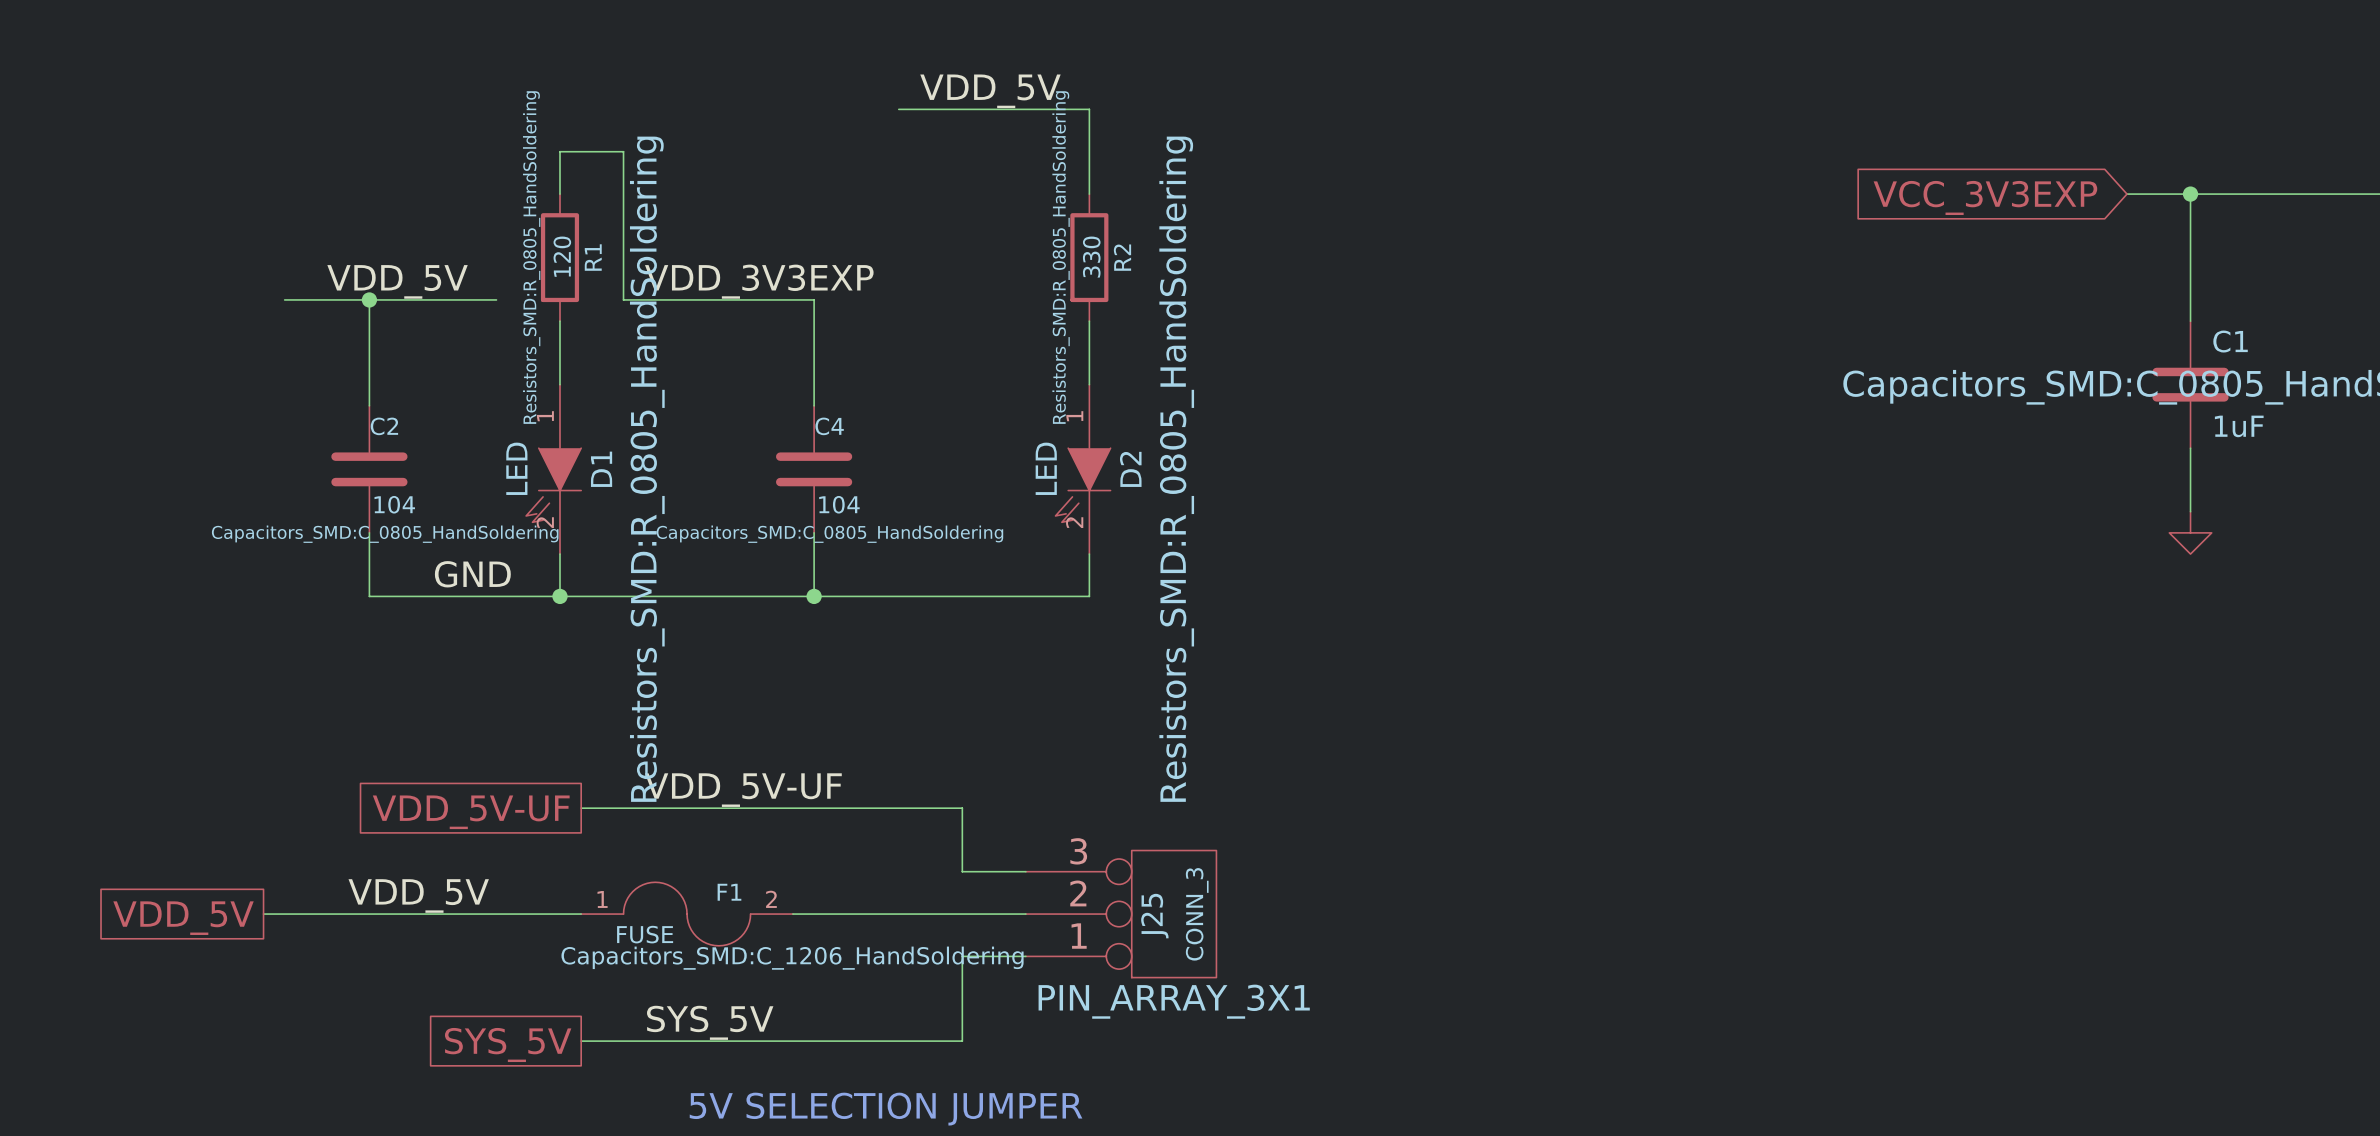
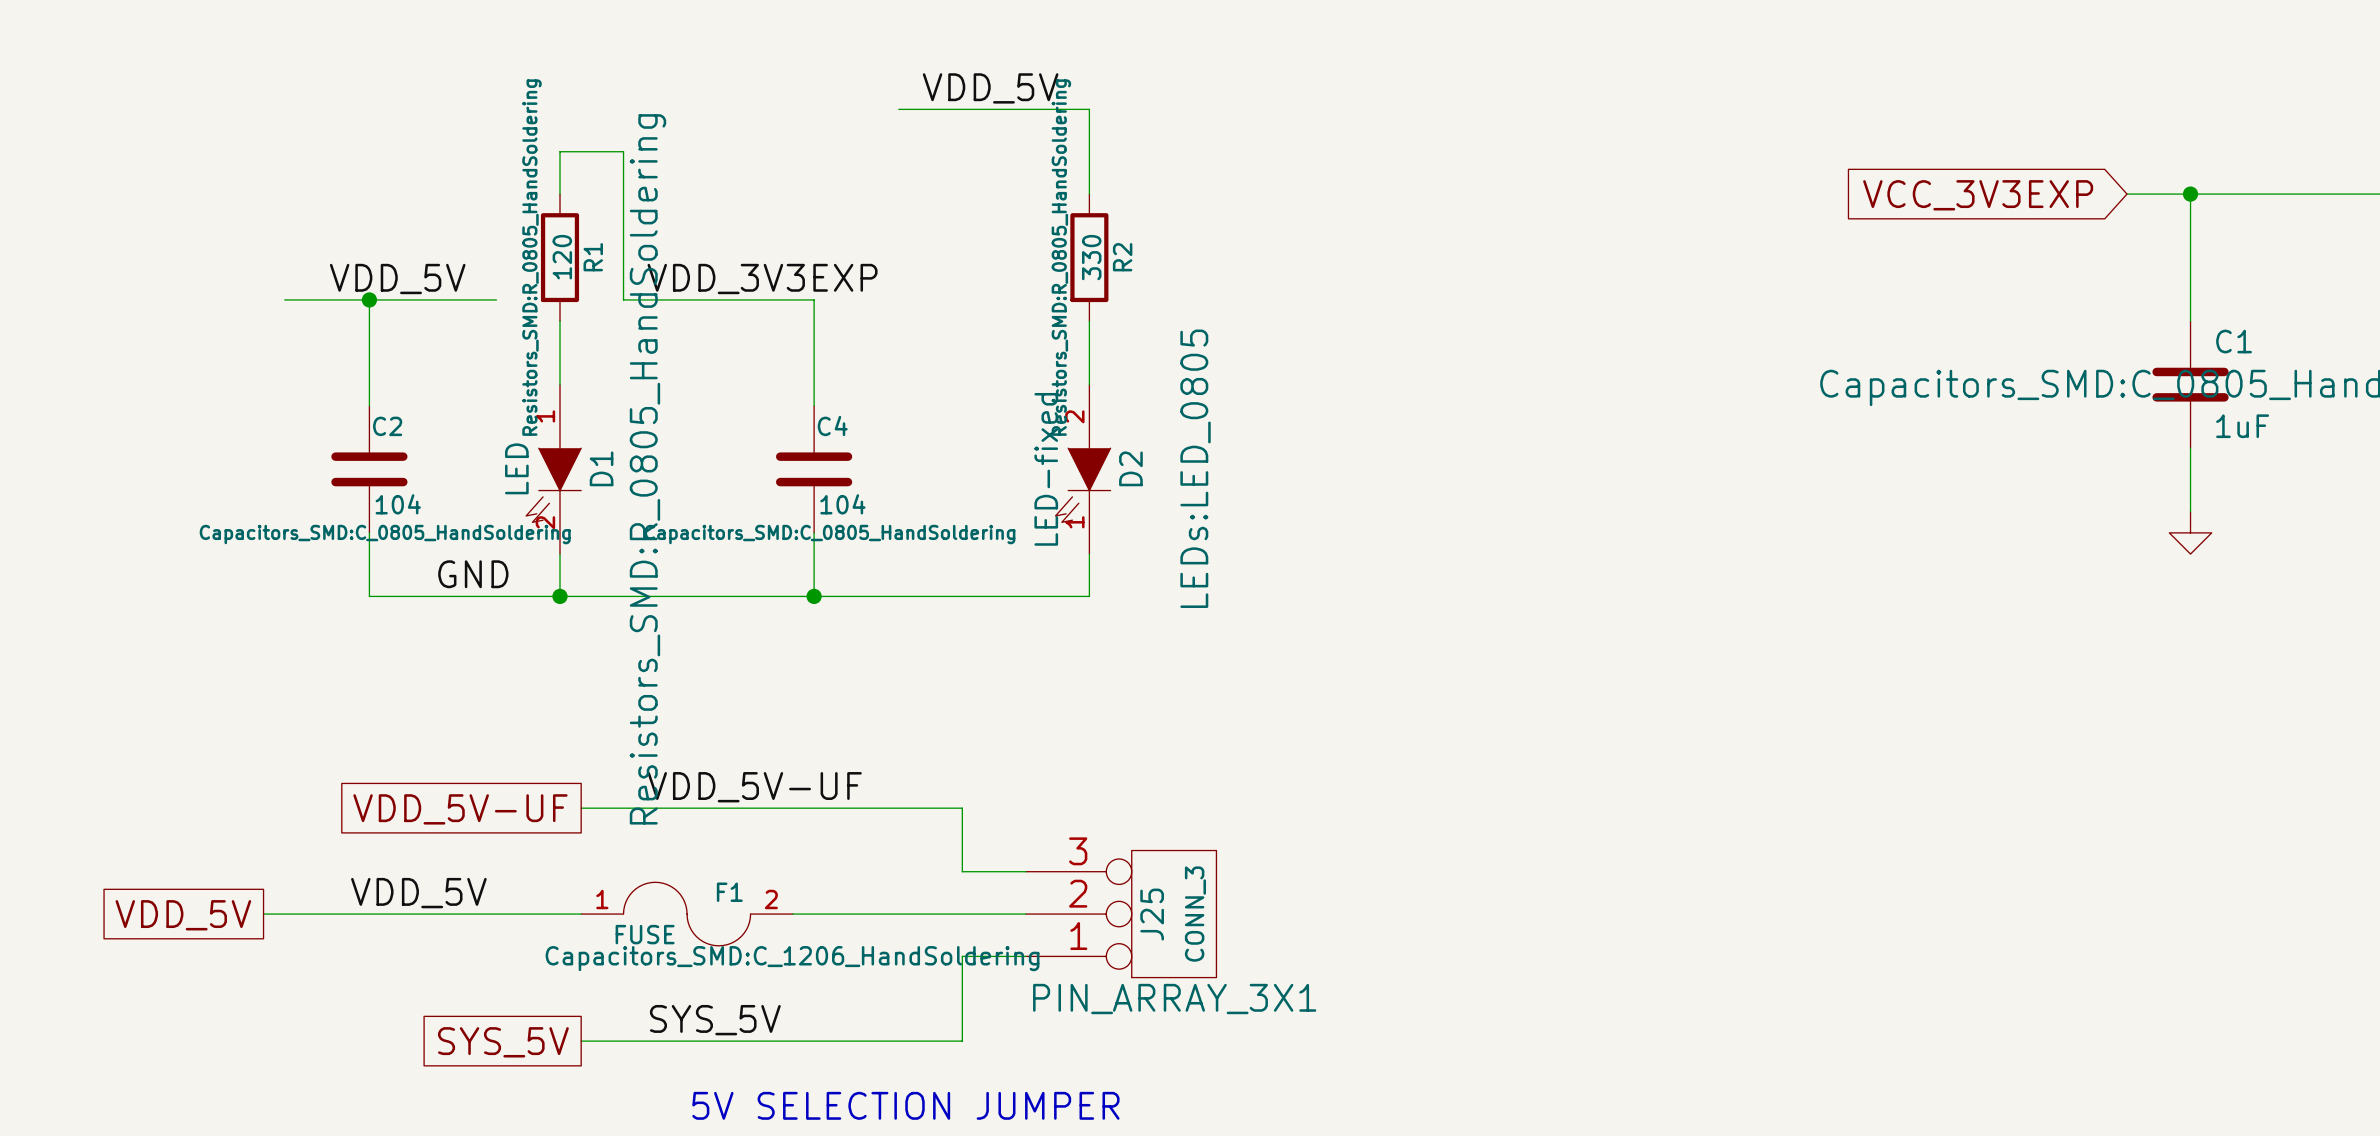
D2 pin number: 1 (1074, 416) -> 2 (1074, 416)
D2 value: LED (1046, 468) -> LED-fixed (1046, 469)
D2 text: Resistors_SMD:R_0805_HandSoldering (1176, 469) -> LEDs:LED_0805 (1195, 468)
D2 pin number: 2 (1074, 522) -> 1 (1074, 522)

